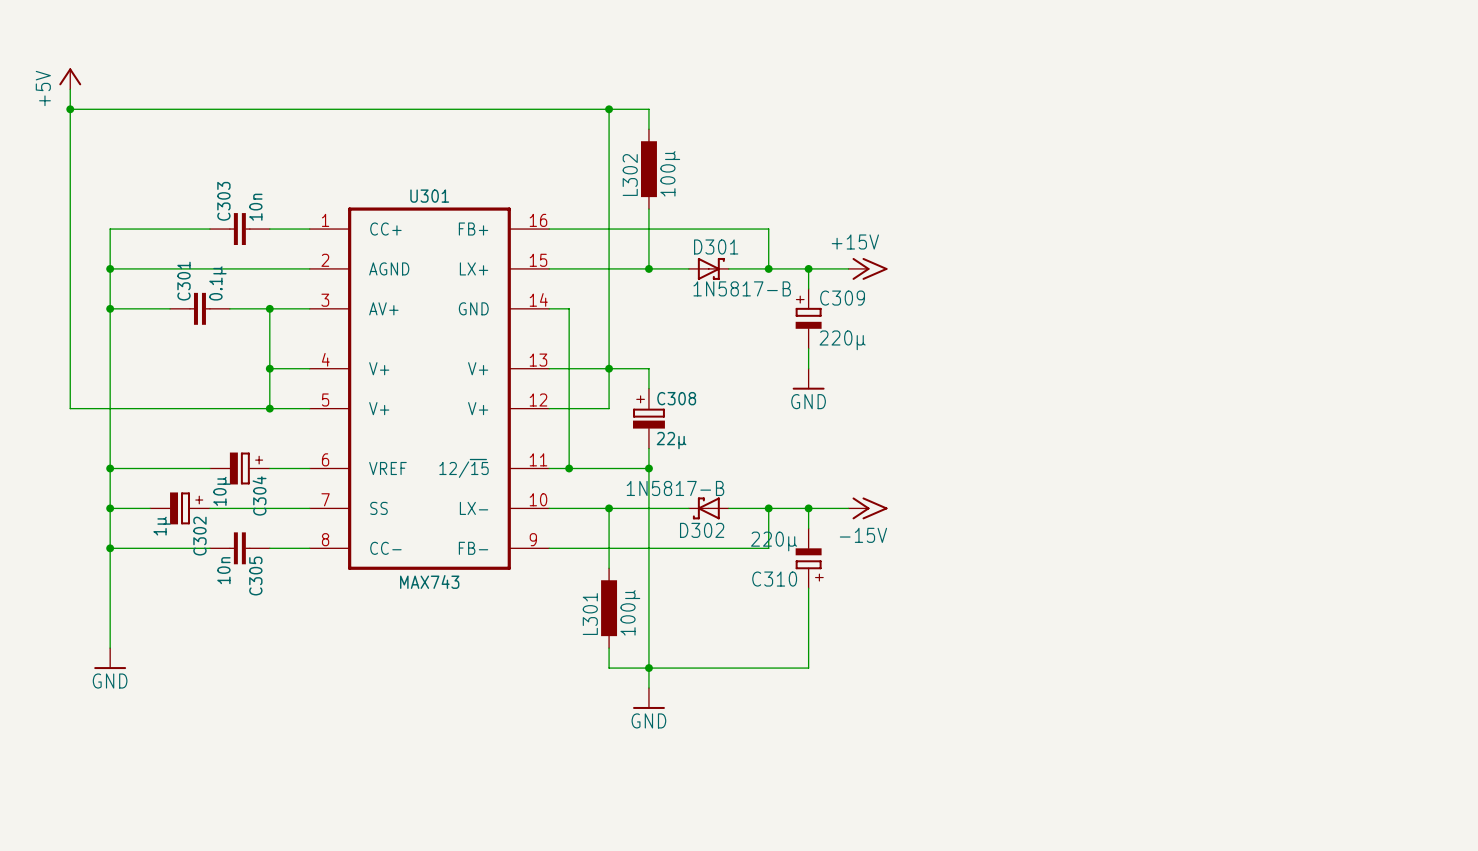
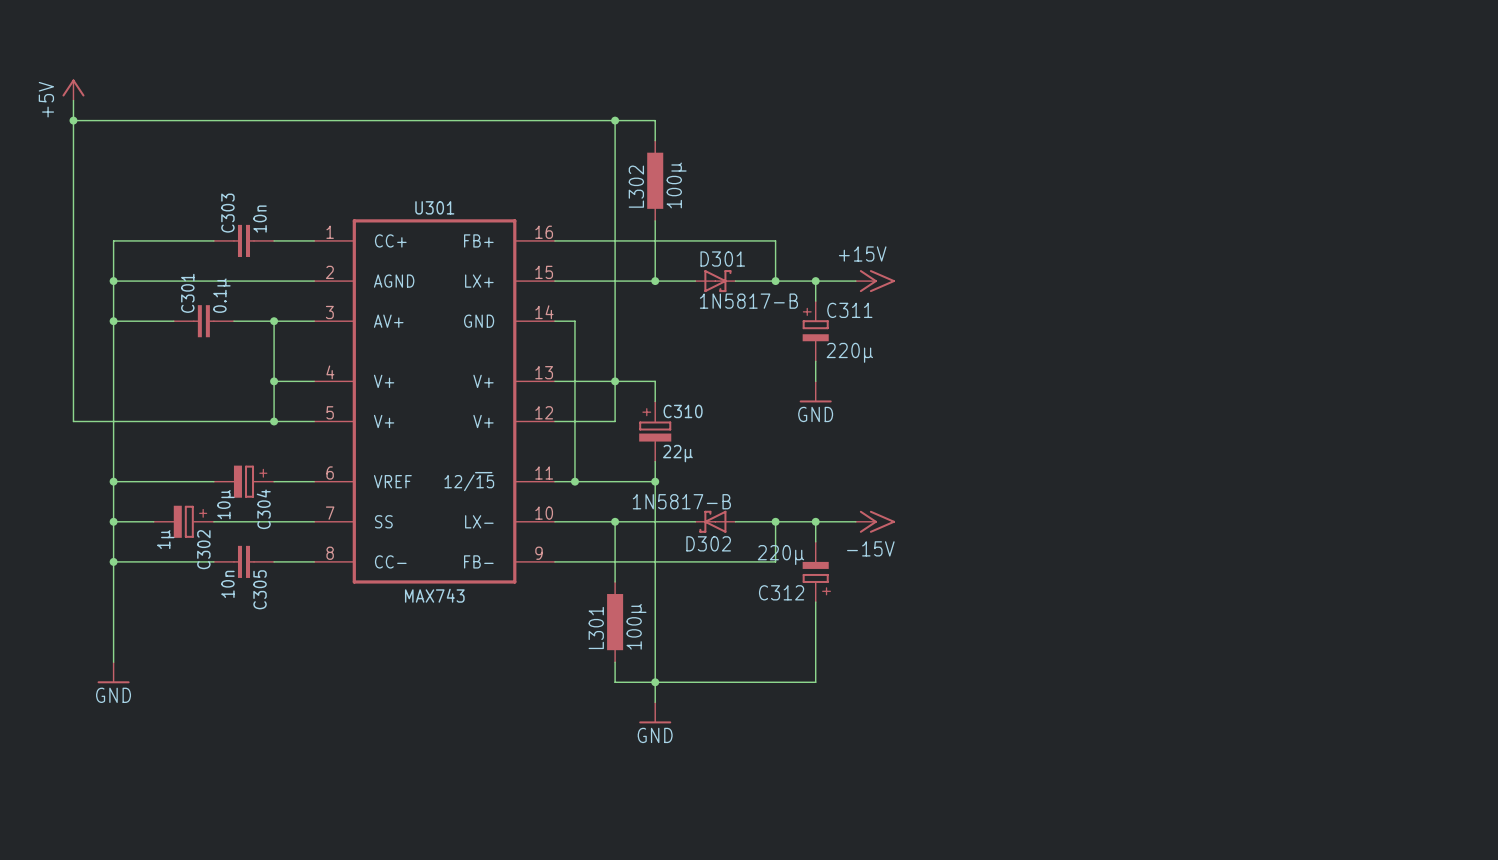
C309 name: C309 (842, 298) -> C311 (849, 310)
C308 name: C308 (676, 398) -> C310 (683, 411)
C310 name: C310 (774, 579) -> C312 (781, 592)

